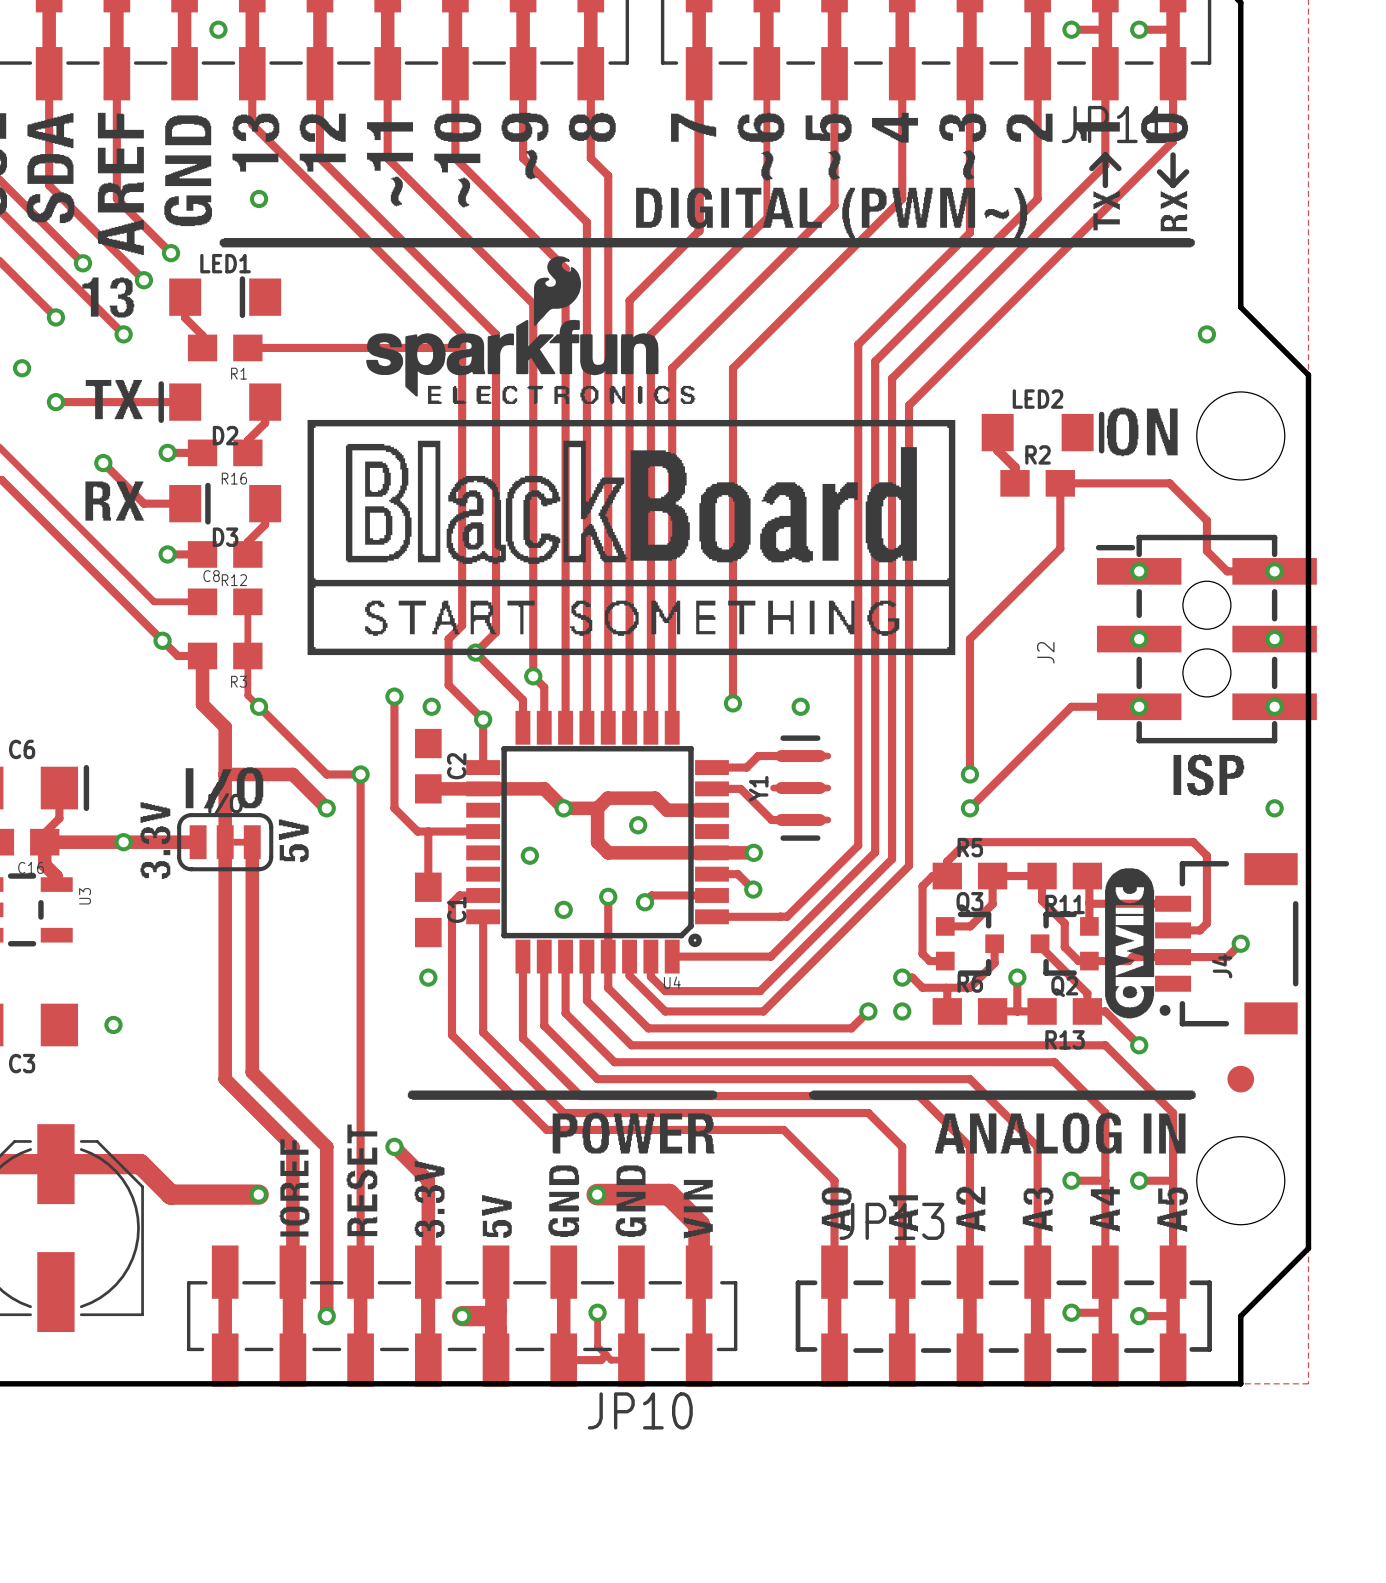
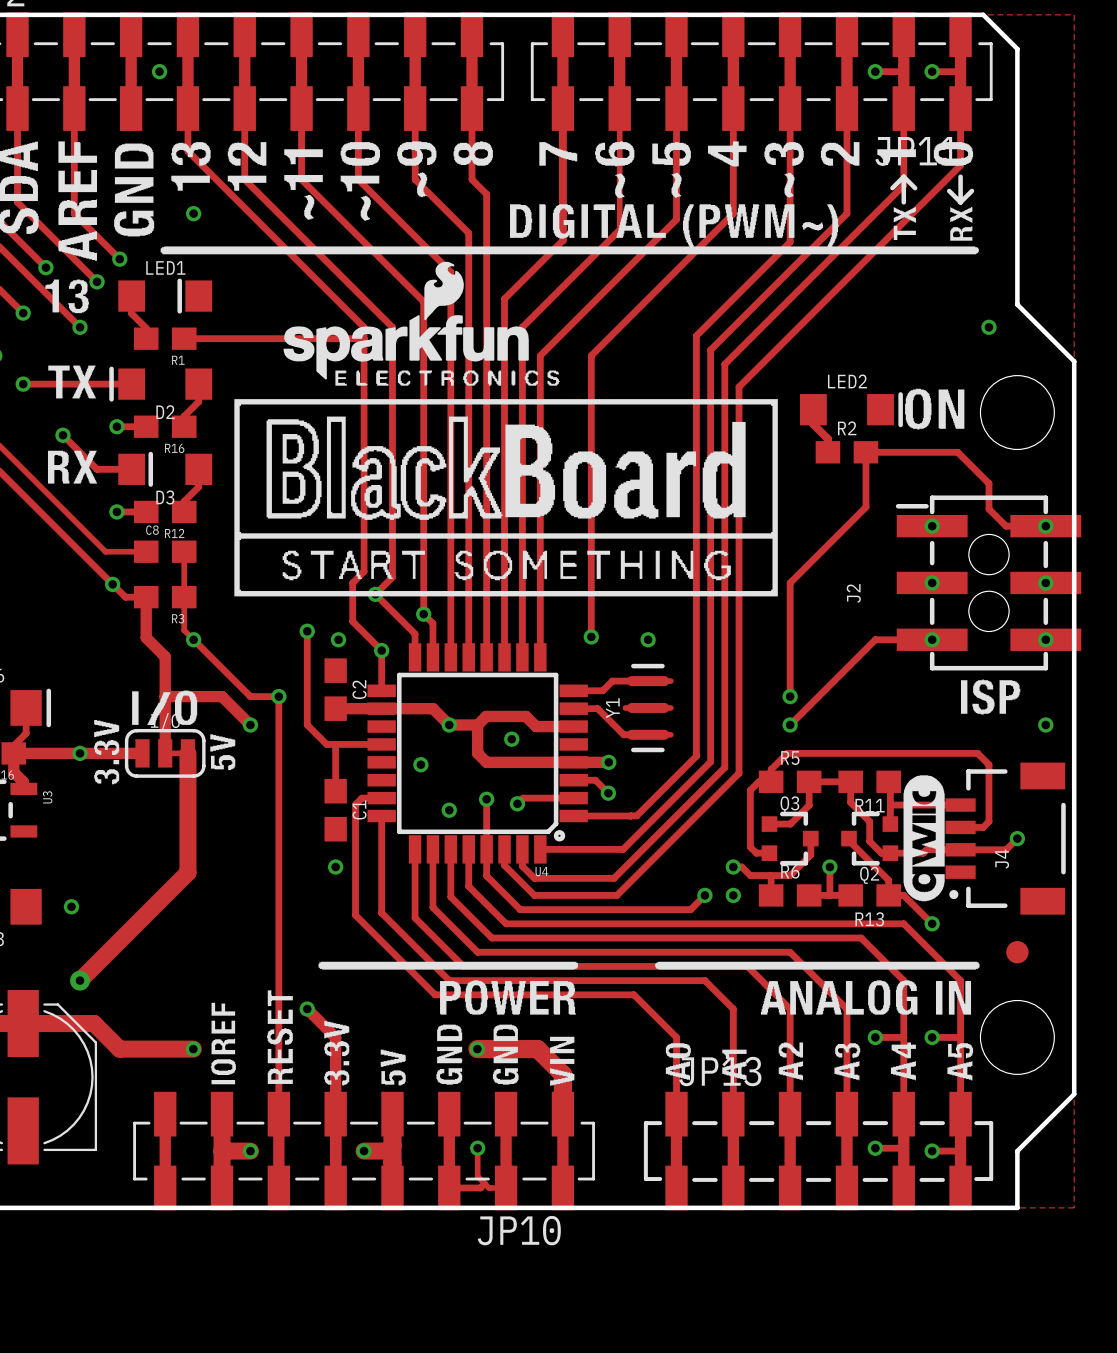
track: (225, 842) (225, 1079) (292, 1146) (292, 1272) -> none
track width: thin (252, 842) (252, 984) -> thick (187, 753) (187, 872)
track: (252, 984) (252, 1072) (326, 1146) (326, 1316) -> (187, 872) (80, 980)
via: none -> (80, 980)
track: none -> (222, 1151) (250, 1151)

